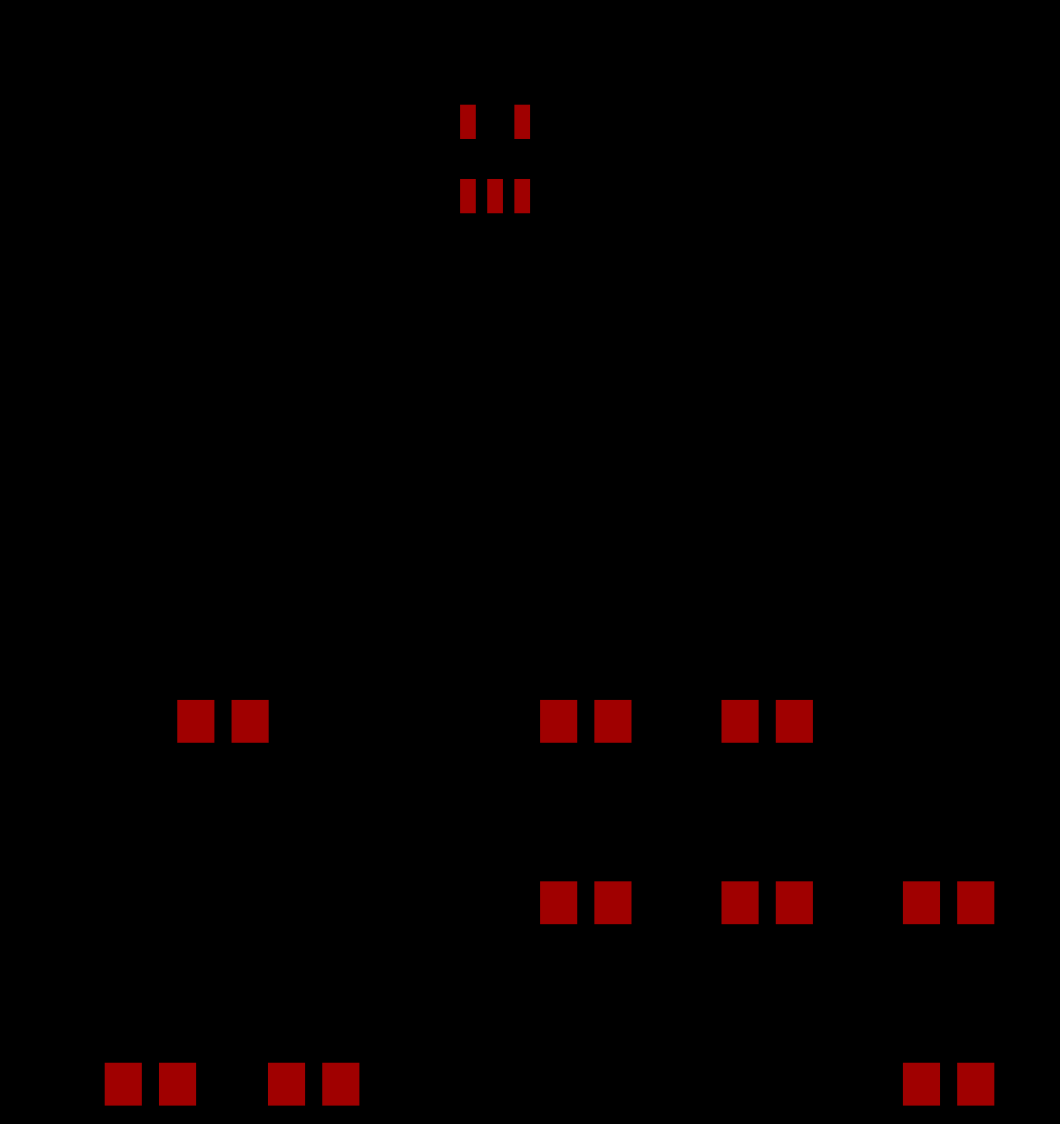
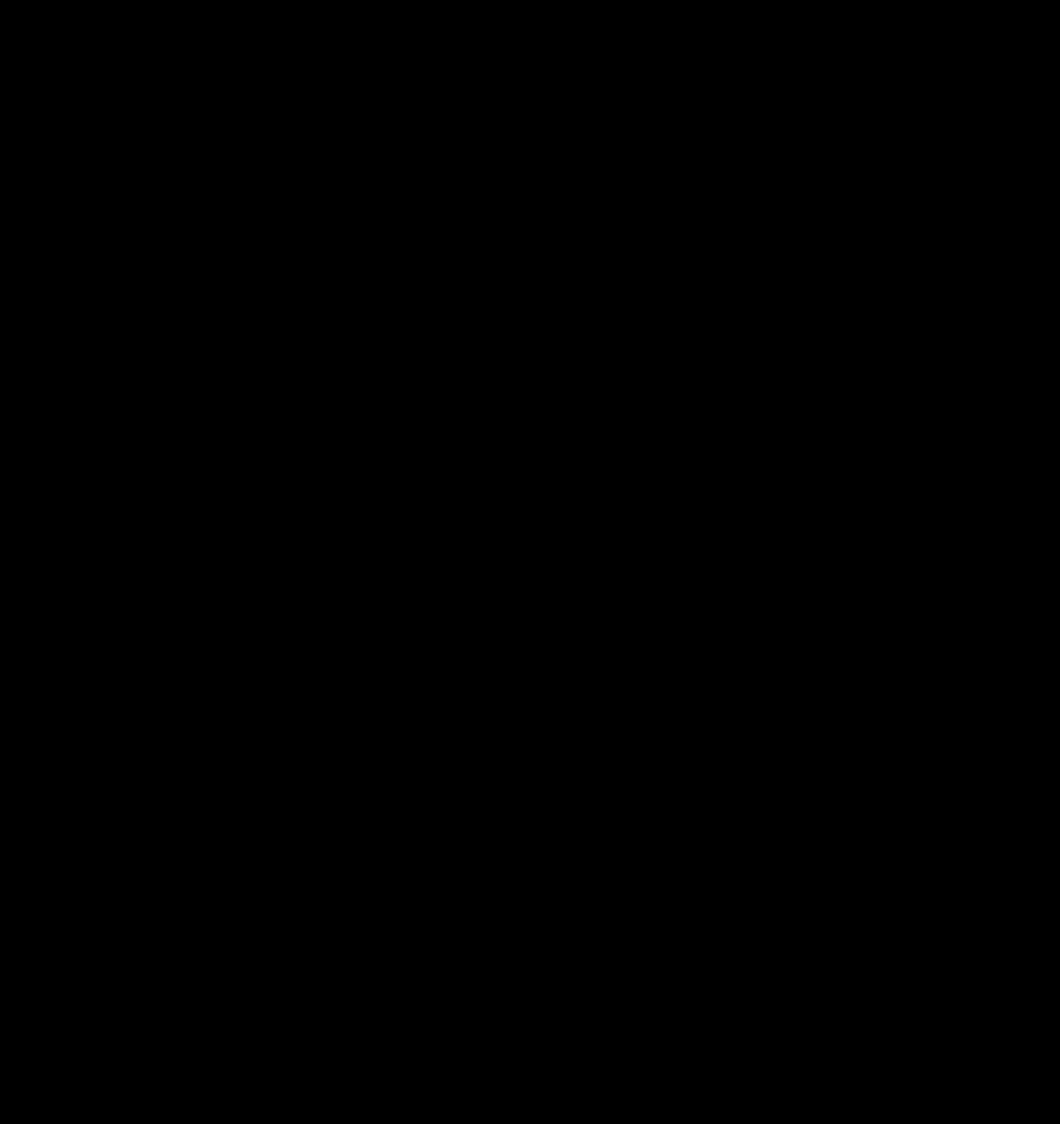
part: (495, 158) -> none
part: (222, 721) -> none
part: (585, 721) -> none
part: (767, 721) -> none
part: (585, 902) -> none
part: (767, 902) -> none
part: (948, 902) -> none
part: (150, 1084) -> none
part: (313, 1084) -> none
part: (948, 1084) -> none

